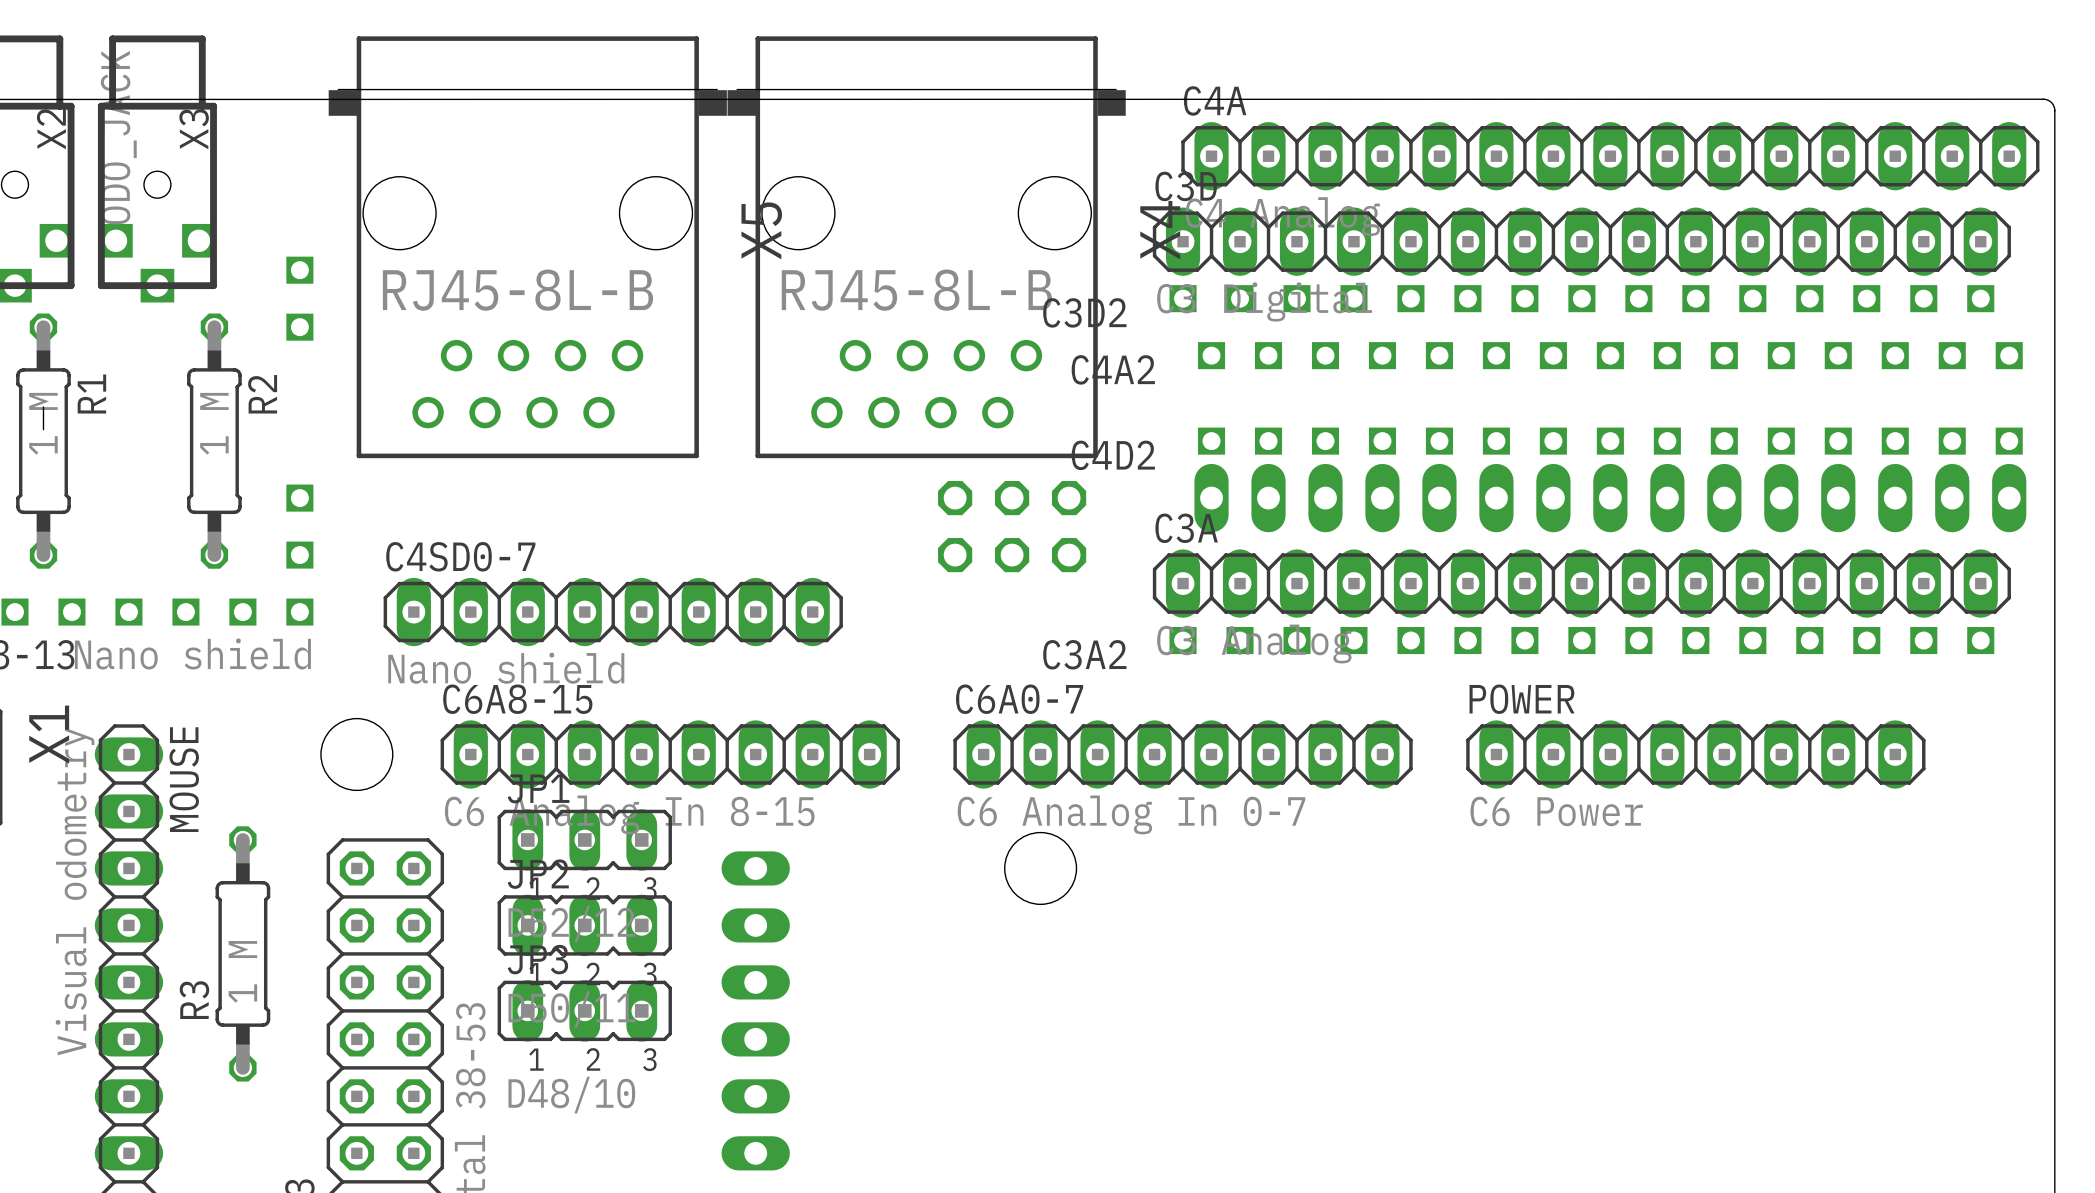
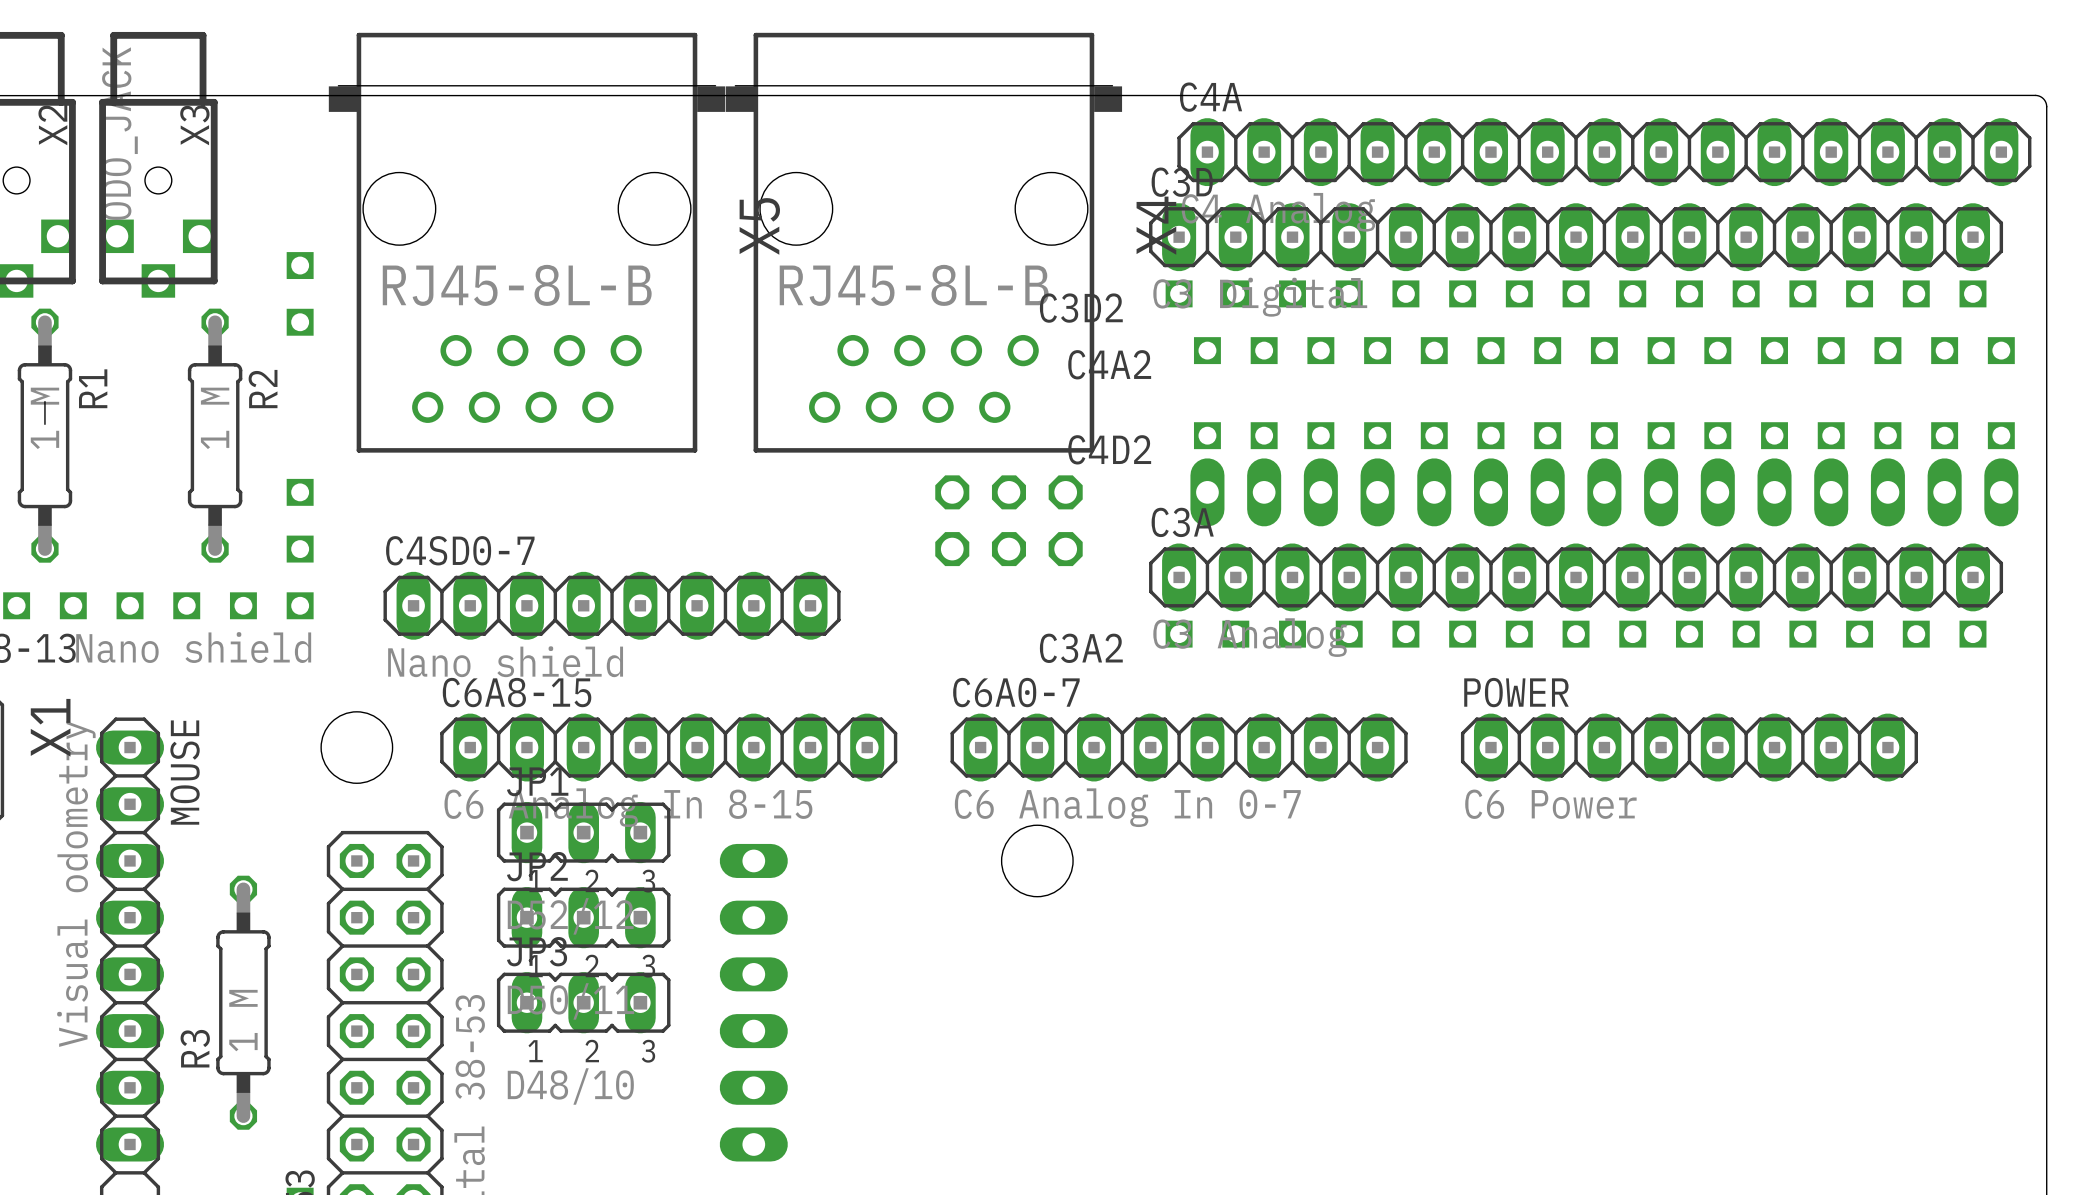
R3 position: (242, 953) -> (243, 1002)

